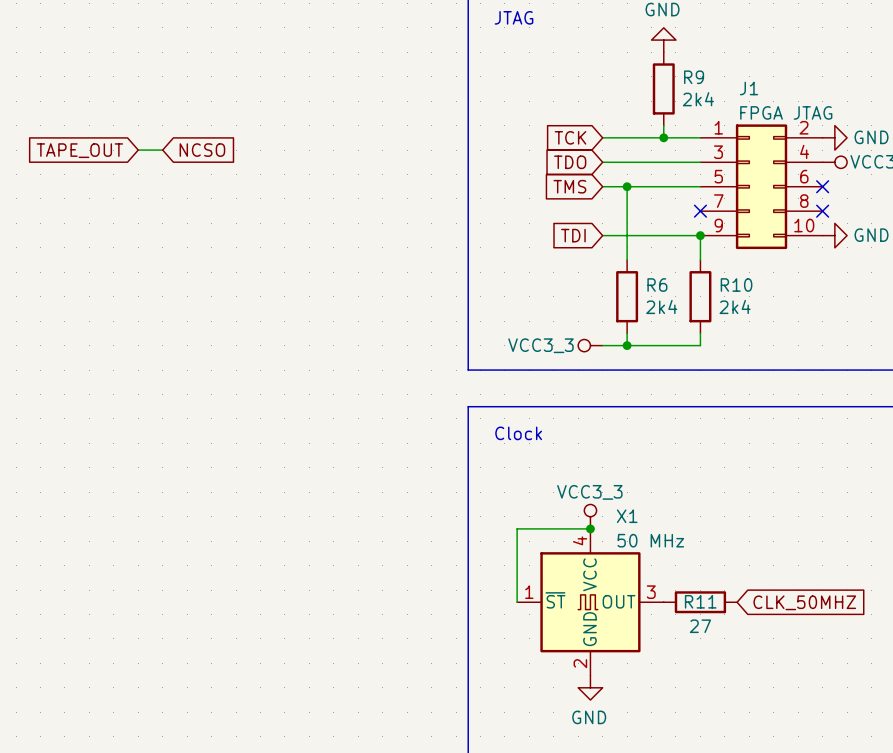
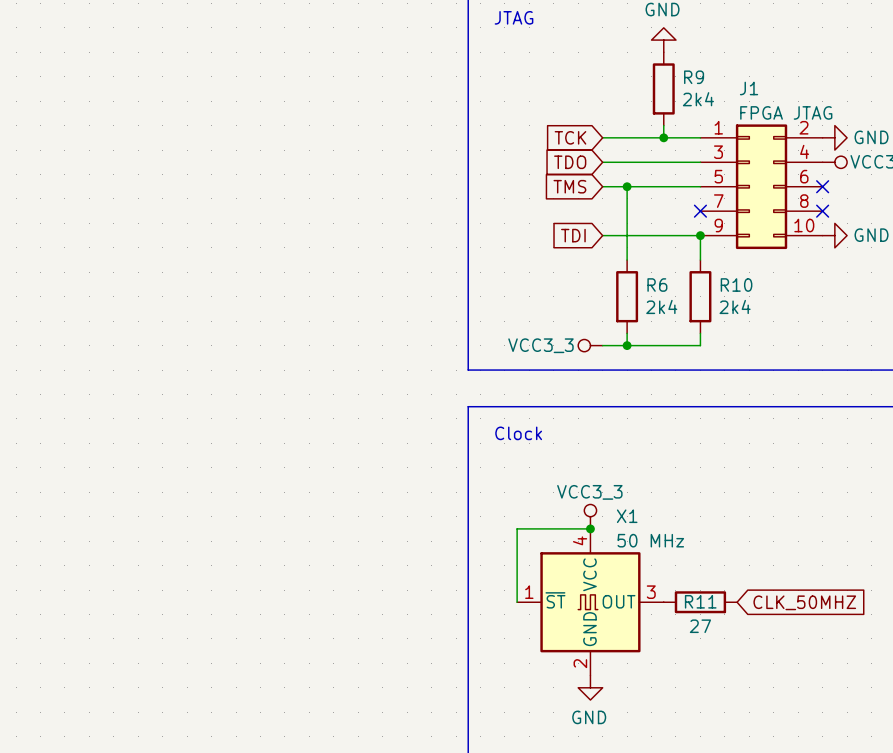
global label: TAPE_OUT (79, 150) -> none
wire: (138, 150) (162, 150) -> none
global label: NCSO (202, 150) -> none

